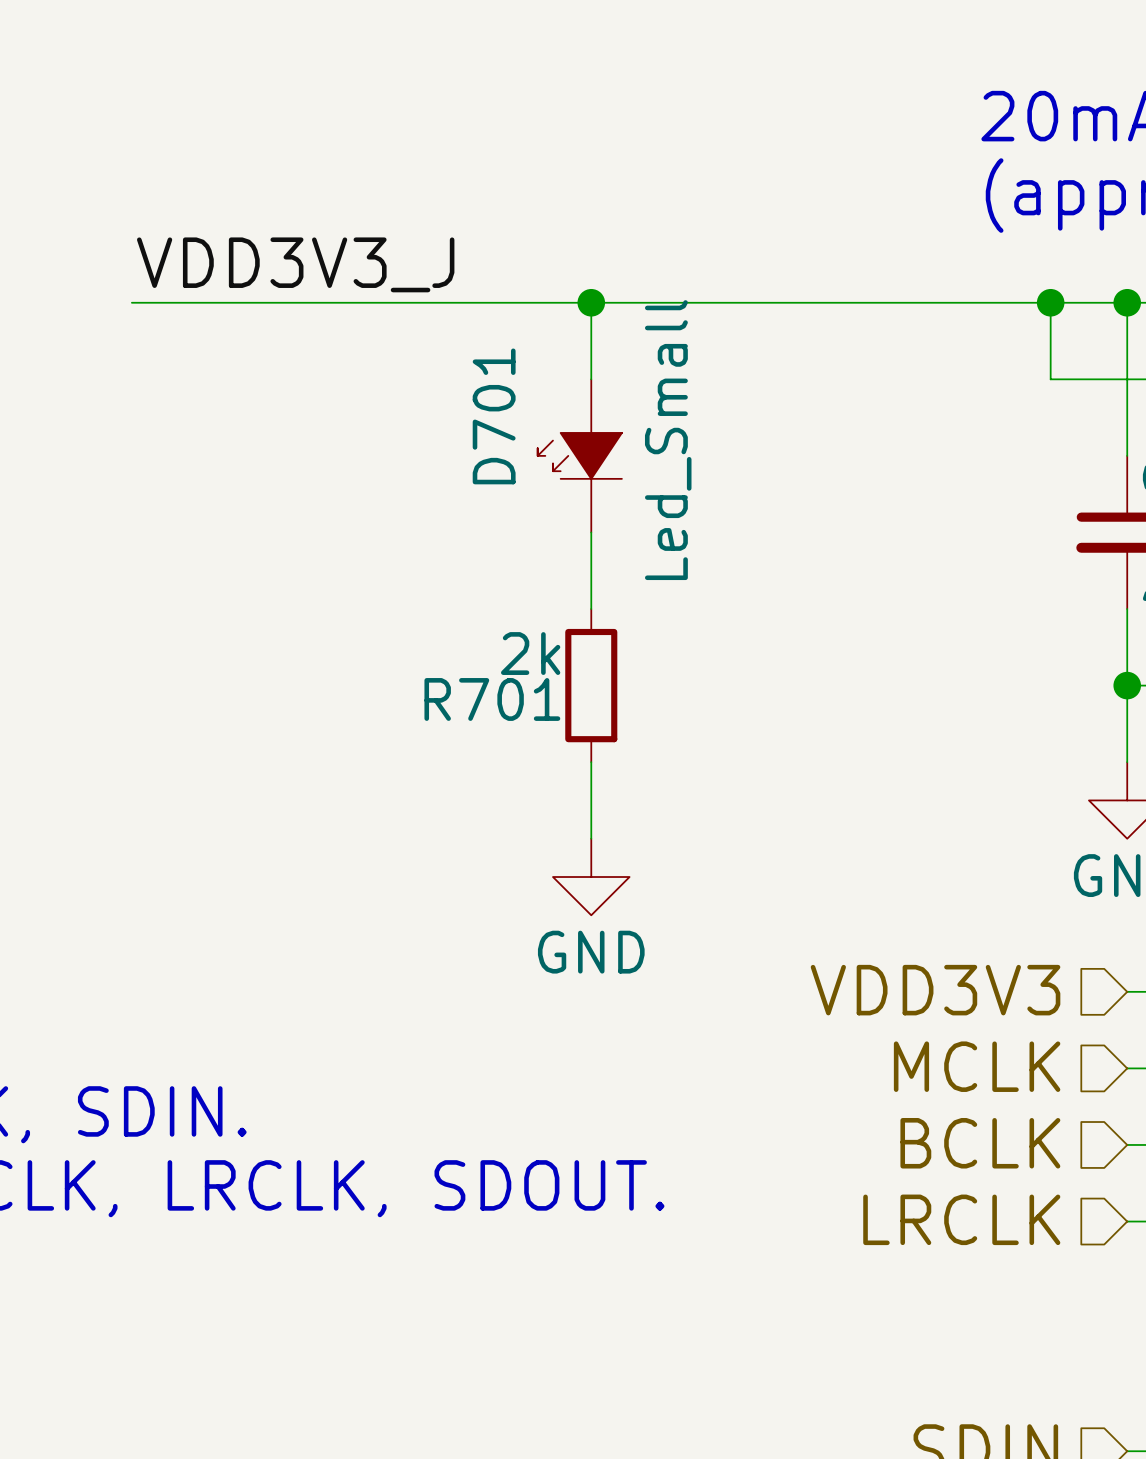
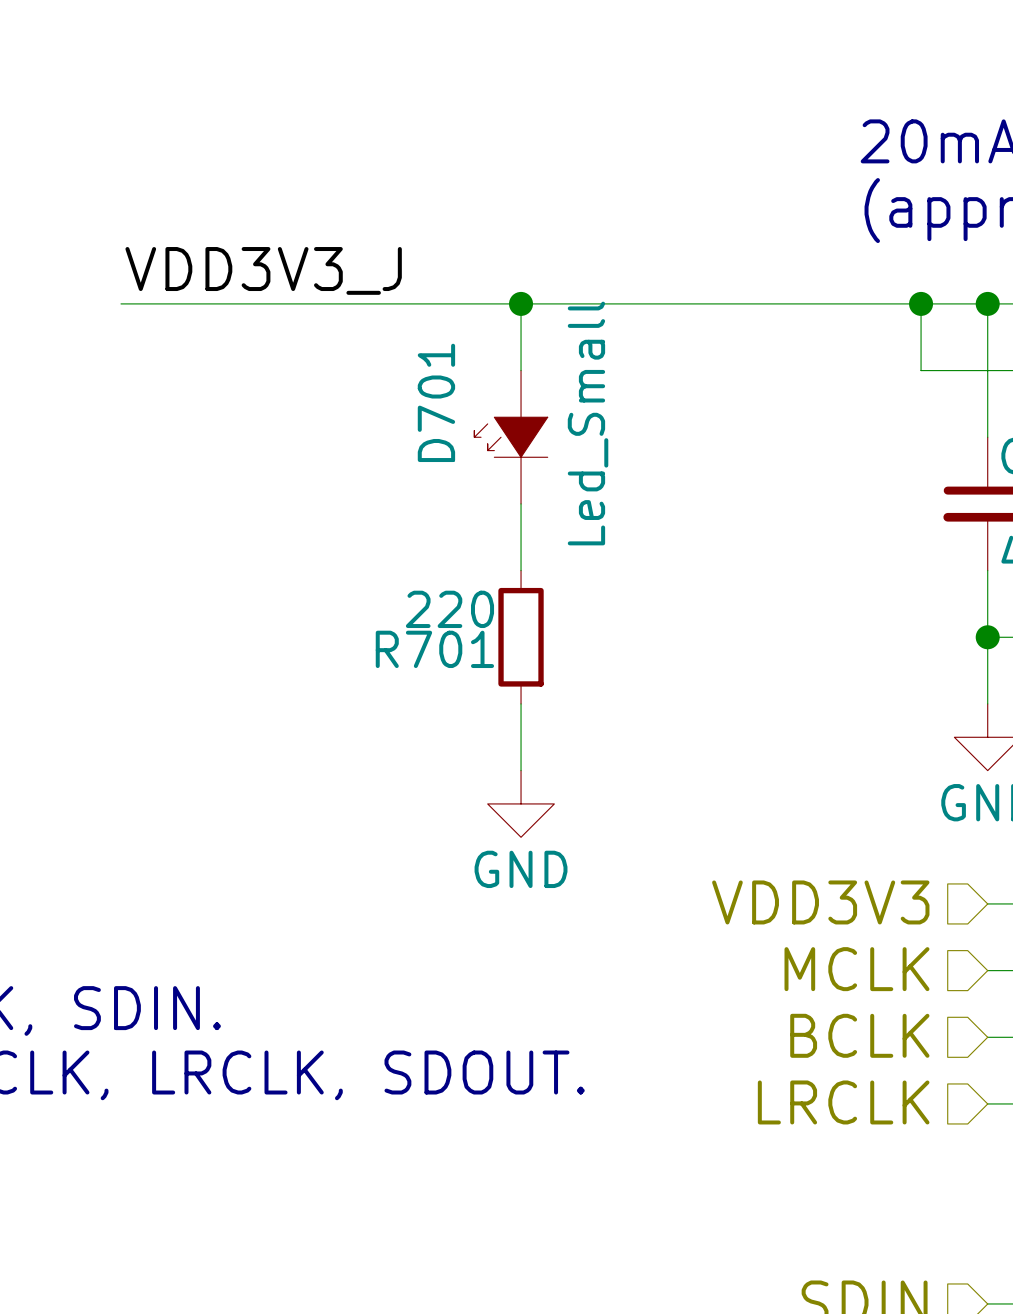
R701 value: 2k (530, 653) -> 220 (449, 609)

